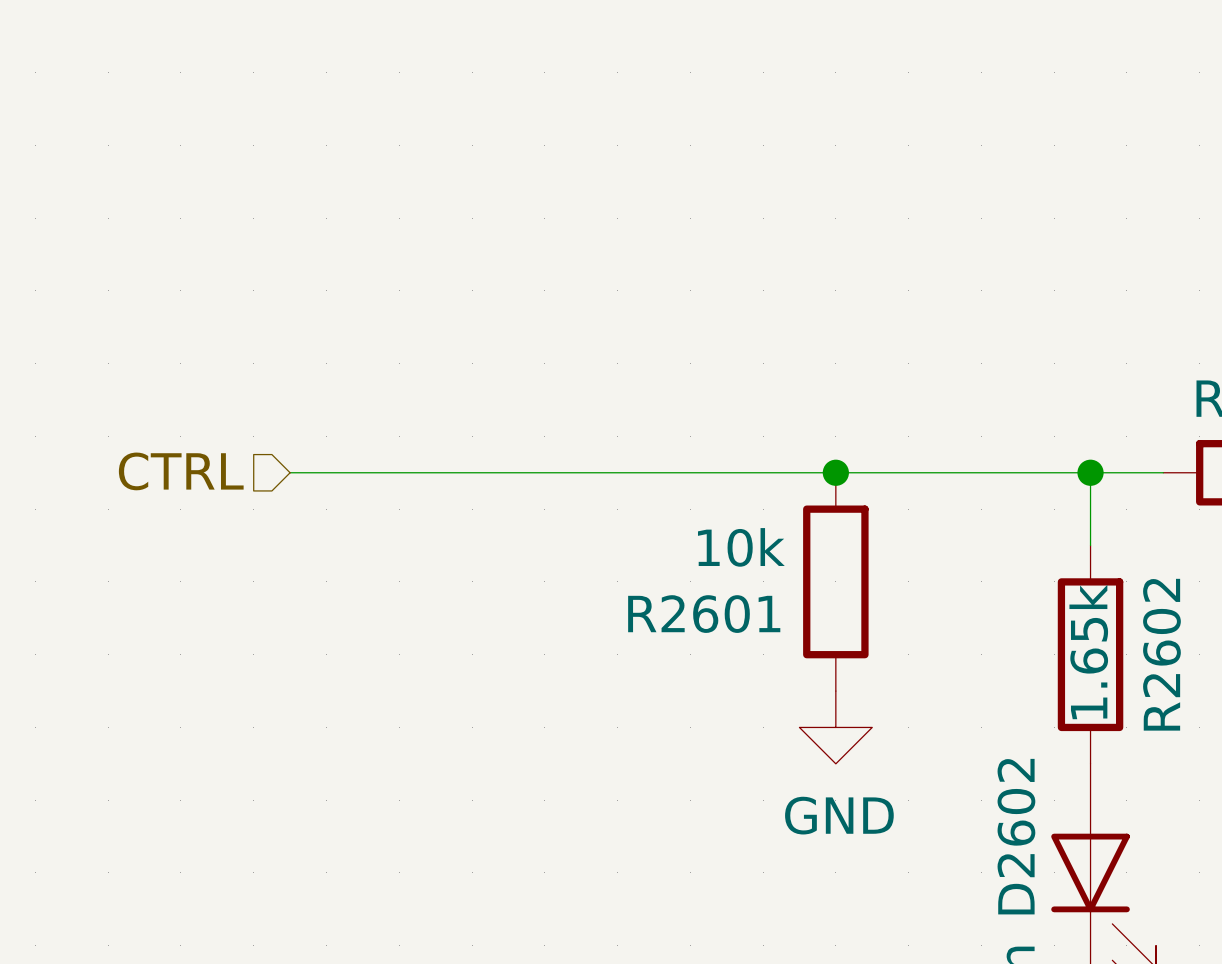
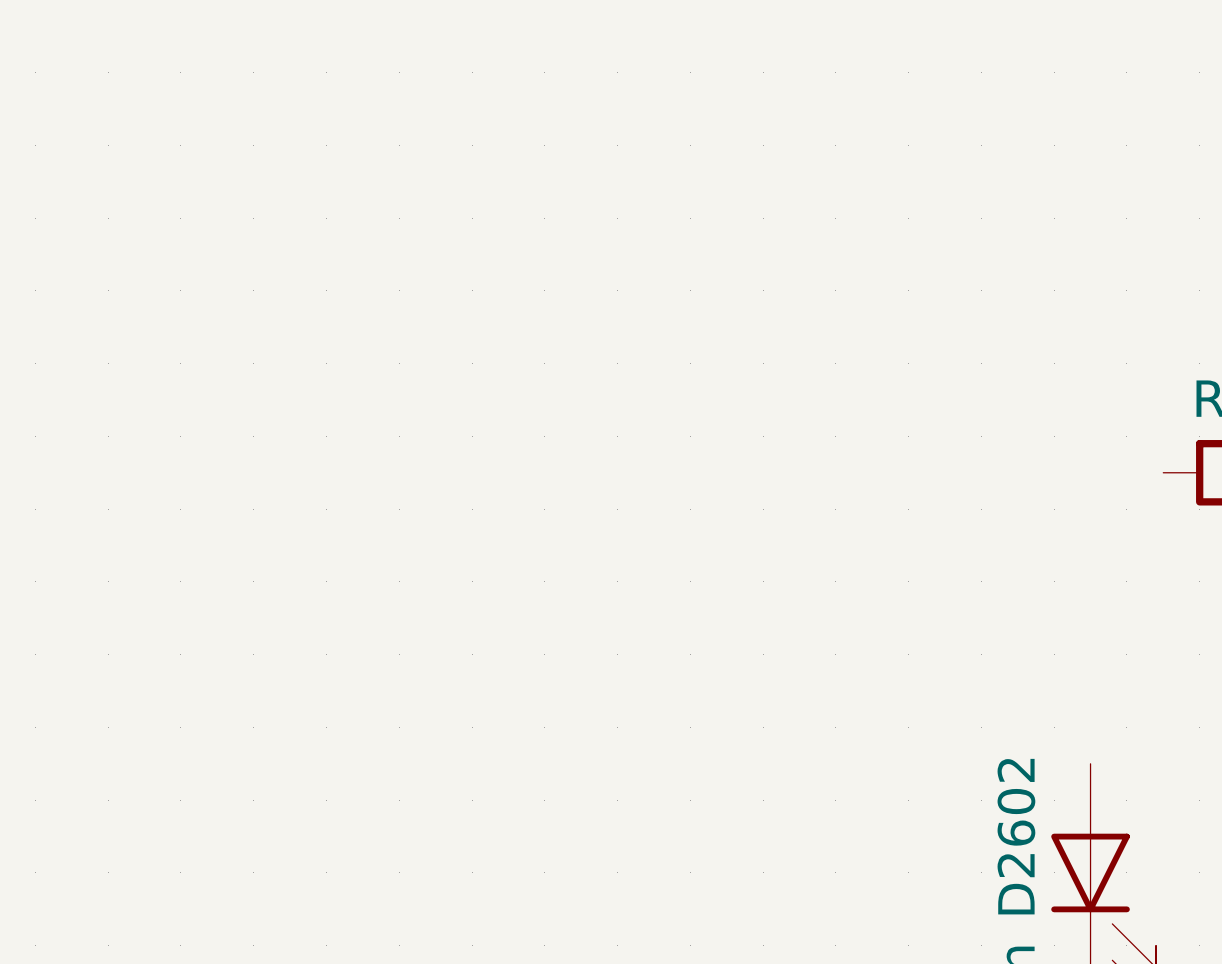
hierarchical label: CTRL (181, 471) -> none
wire: (290, 472) (1163, 472) -> none
junction: (835, 472) -> none
wire: (1090, 472) (1090, 545) -> none
junction: (1090, 472) -> none
R2601: 10k (835, 581) -> none
R2602: 1.65k (1090, 654) -> none
power symbol: GND (835, 727) -> none

